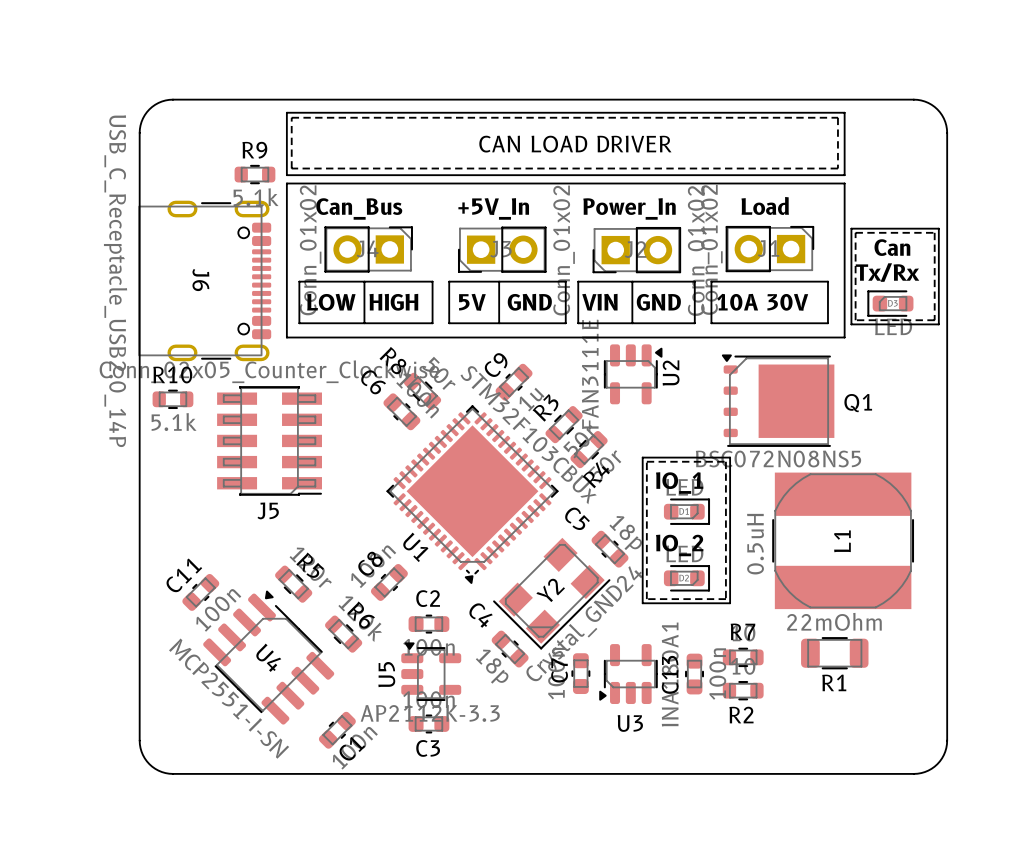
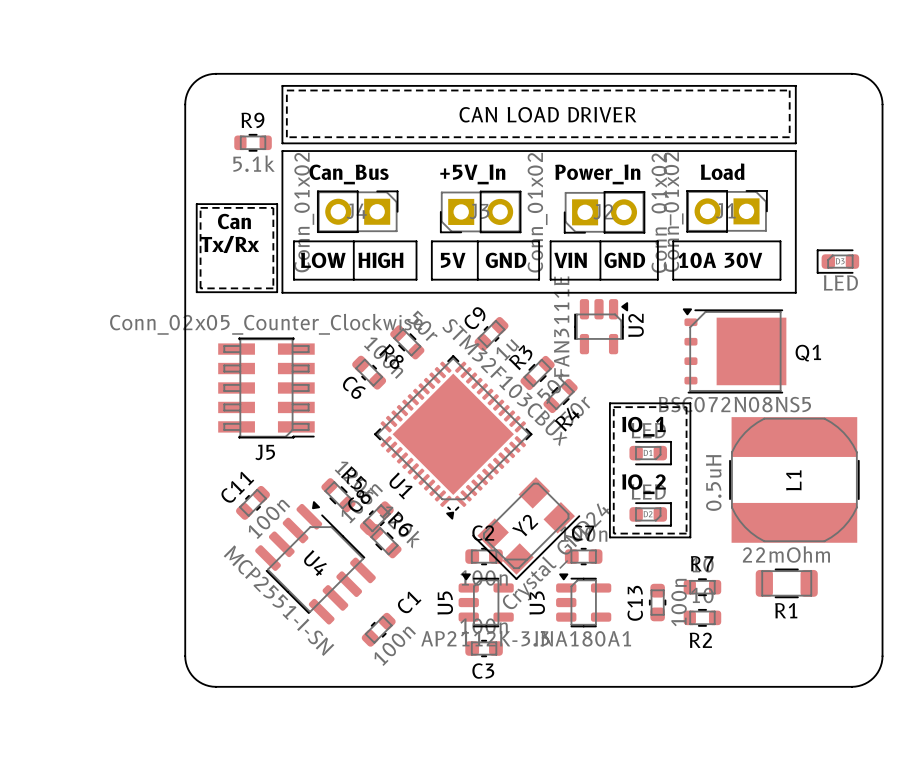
board edge: (214, 99) (161, 101) (146, 112) (139, 129) (139, 740) (142, 755) (149, 764) (158, 770) (169, 773) (913, 773) (924, 772) (937, 764) (945, 751) (947, 740) (947, 132) (943, 118) (934, 106) (921, 100) (905, 99) -> (215, 73) (202, 76) (194, 82) (186, 94) (185, 104) (185, 656) (188, 669) (194, 677) (205, 685) (215, 686) (851, 686) (865, 683) (873, 677) (879, 669) (882, 656) (882, 104) (880, 94) (873, 82) (861, 75) (851, 73)
line: (851, 228) (938, 228) (938, 324) (851, 324) (851, 228) -> none
line: (855, 232) (934, 232) (934, 320) (855, 320) (855, 232) -> none
line: none -> (196, 204) (277, 204) (277, 292) (196, 292) (196, 204)
line: none -> (200, 207) (273, 207) (273, 288) (200, 288) (200, 207)
text: Can (892, 247) -> none
text: none -> Can (234, 221)
text: Tx/Rx (887, 272) -> none
J6: USB_C_Receptacle_USB2.0_14P (204, 280) -> none
text: none -> Tx/Rx (229, 244)
R8 name position: R8 (392, 360) -> R8 (391, 356)
C6 name position: C6 (373, 382) -> C6 (354, 387)
R10: 5.1k (172, 399) -> none
C6 position: (401, 411) -> (369, 372)
C5: 18p (610, 549) -> none
R5 position: (293, 584) -> (338, 495)
C11 position: (200, 592) -> (253, 502)
C2 position: (428, 624) -> (484, 556)
R6 position: (343, 634) -> (384, 541)
C4: 18p (510, 649) -> none
U4 position: (268, 657) -> (315, 562)
U5 position: (431, 671) -> (486, 600)
C7 rotation: 0° (580, 673) -> 90° clockwise (583, 556)
C7 position: (580, 673) -> (583, 556)
U3 rotation: 0° (628, 674) -> 90° clockwise (583, 600)
C3 position: (428, 723) -> (484, 648)
C1 position: (337, 730) -> (378, 629)
C1 name position: C1 (352, 748) -> C1 (409, 602)

